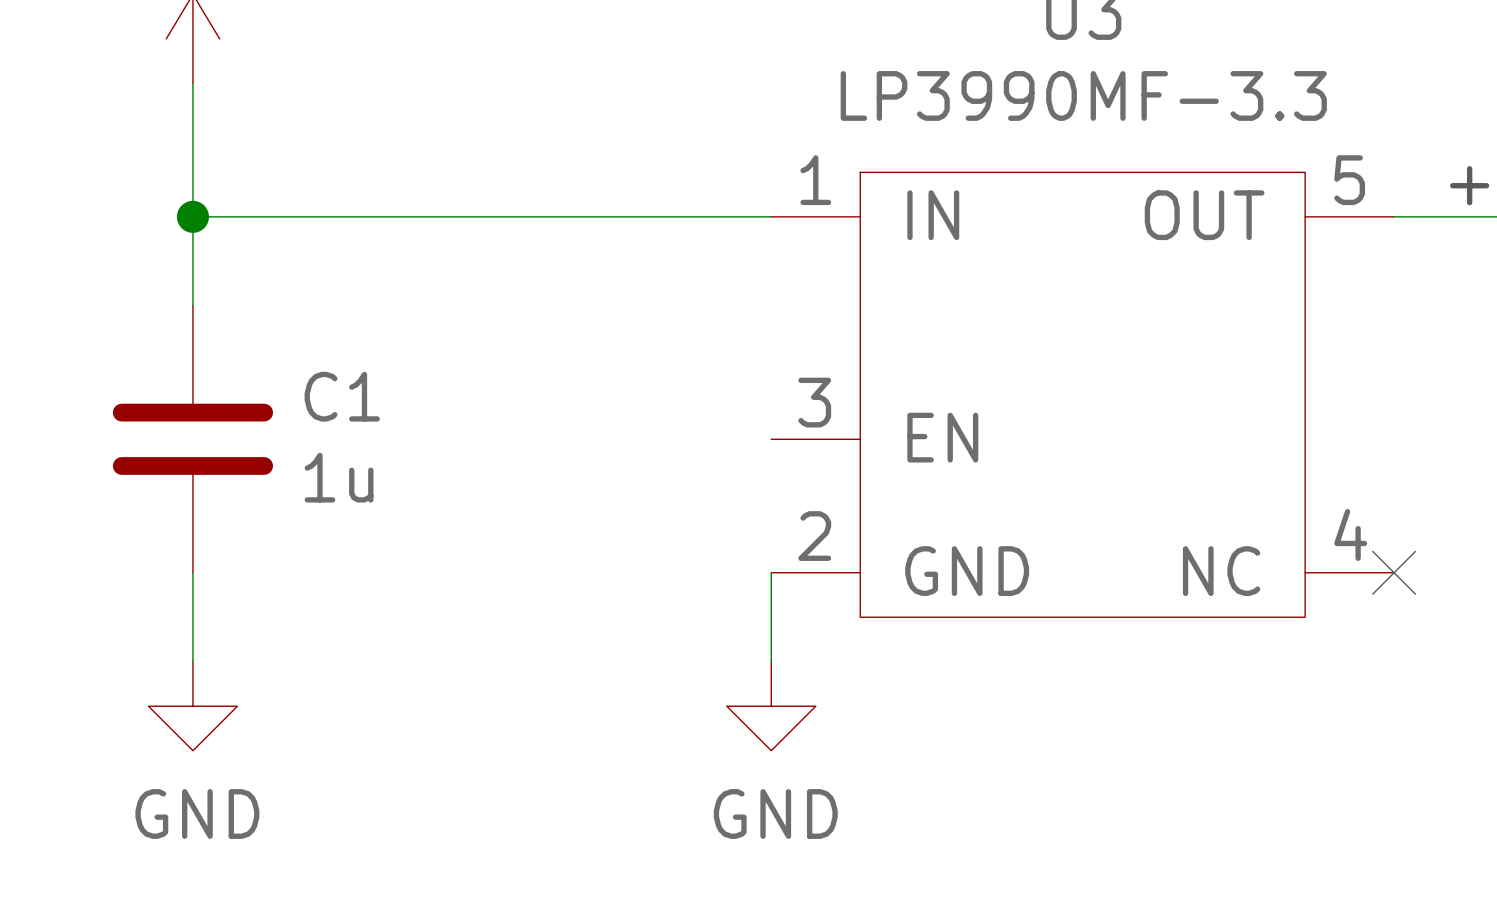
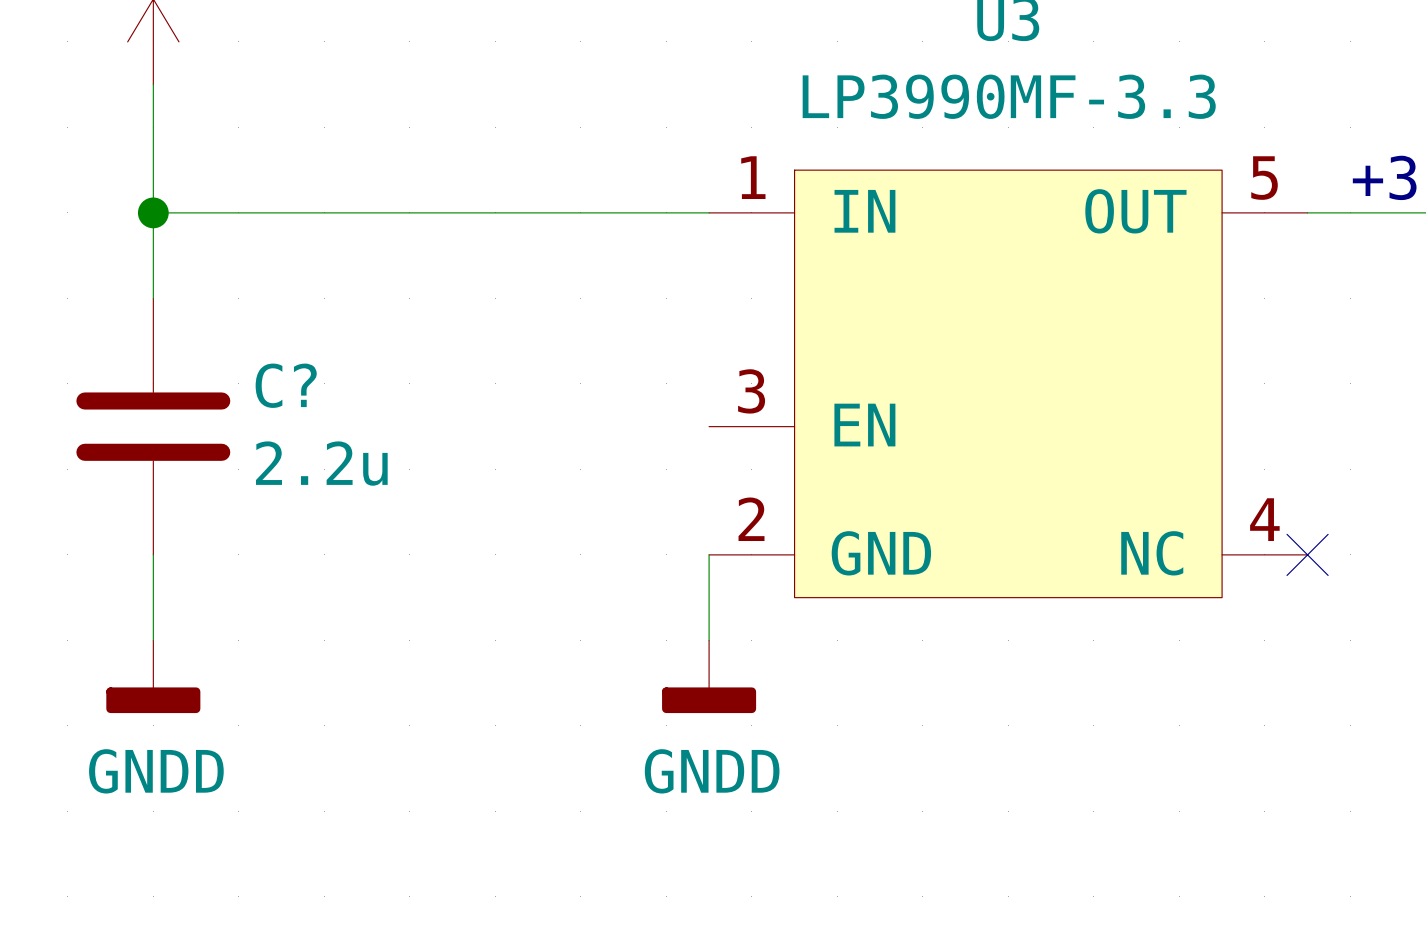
C1 name: C1 (342, 396) -> C? (286, 385)
C1 value: 1u (339, 477) -> 2.2u (321, 463)
power symbol: GND (192, 706) -> GNDD (153, 676)
power symbol: GND (771, 706) -> GNDD (709, 676)

